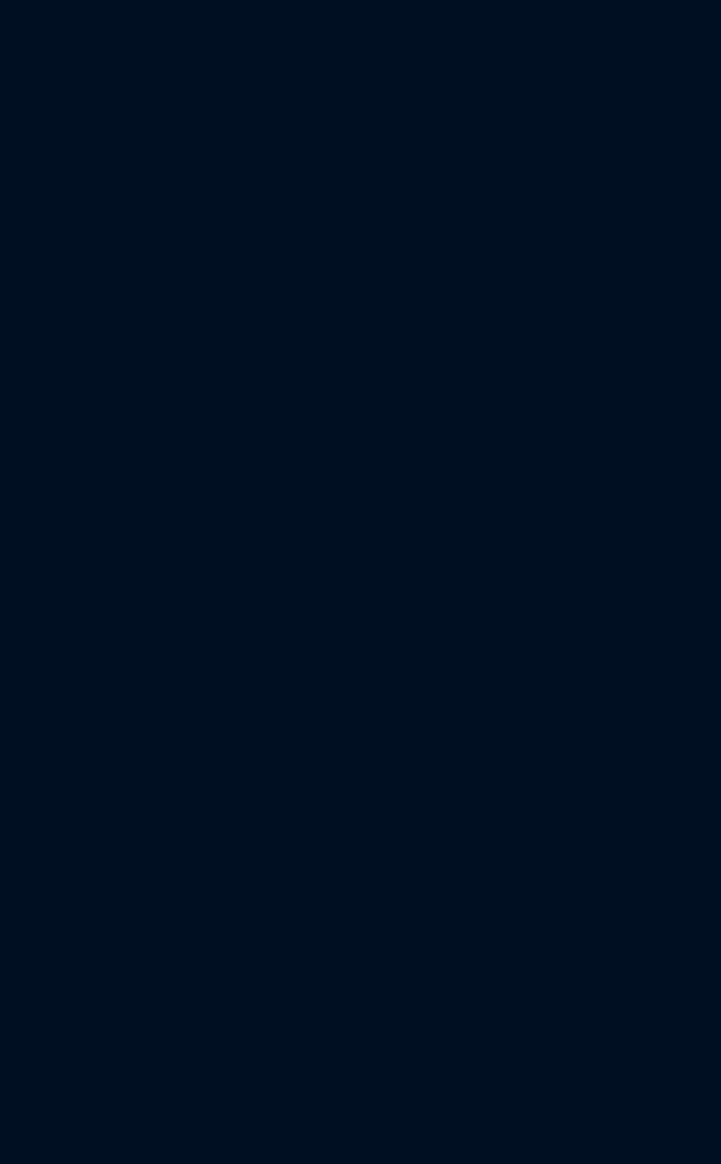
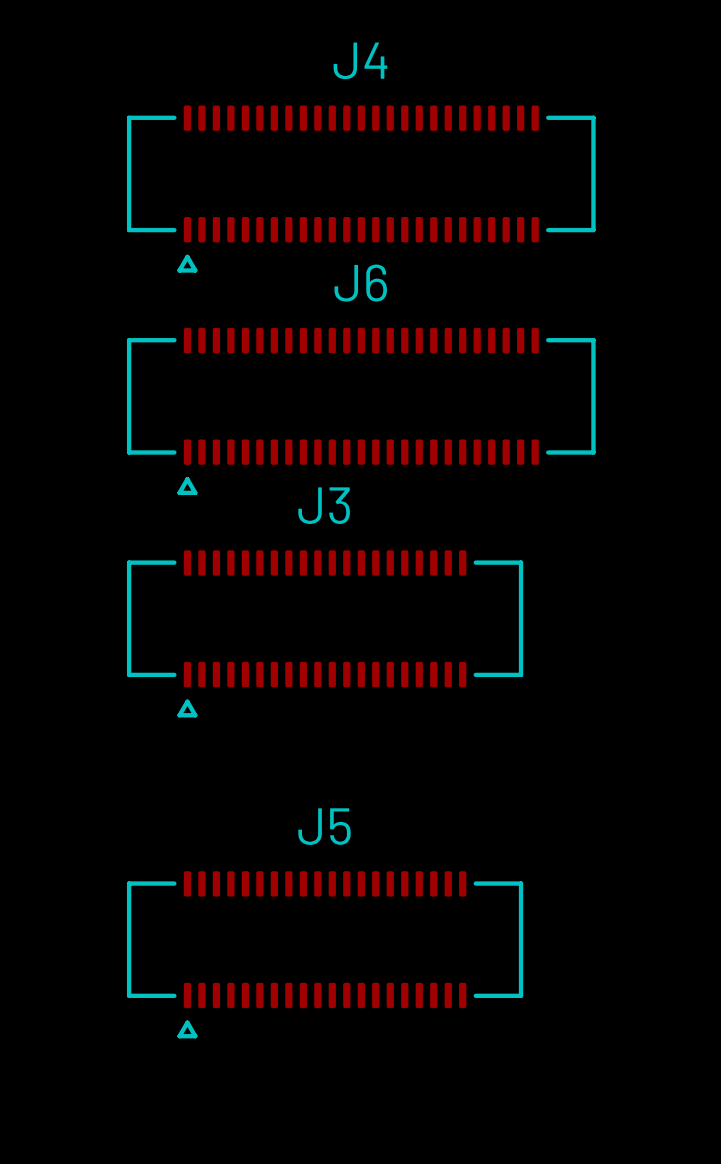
J4: none -> (361, 189)
J6: none -> (361, 411)
J3: none -> (325, 633)
J5: none -> (325, 954)

